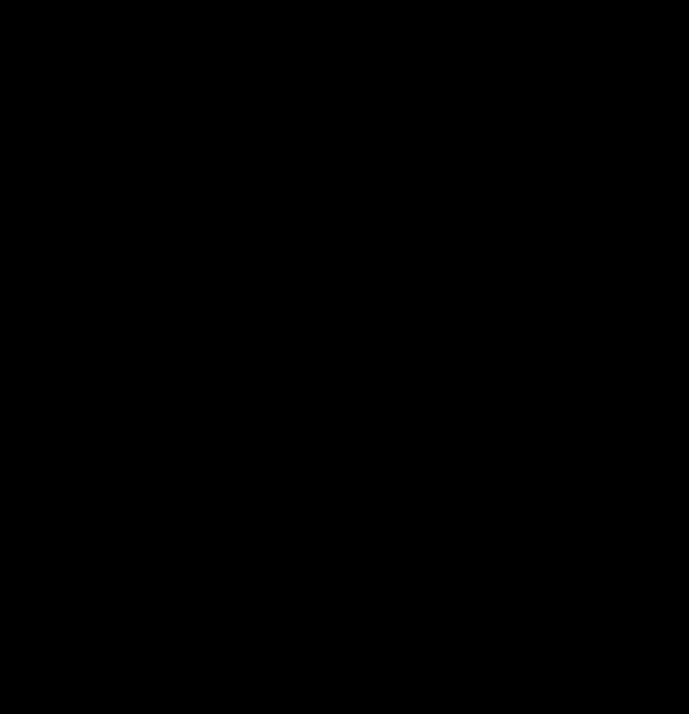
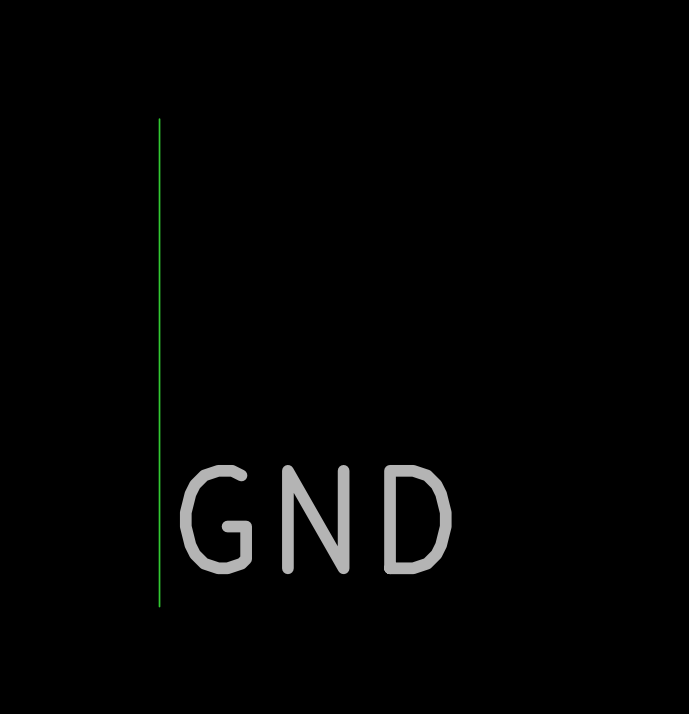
wire: none -> (159, 119) (159, 606)
label: none -> GND (315, 519)

